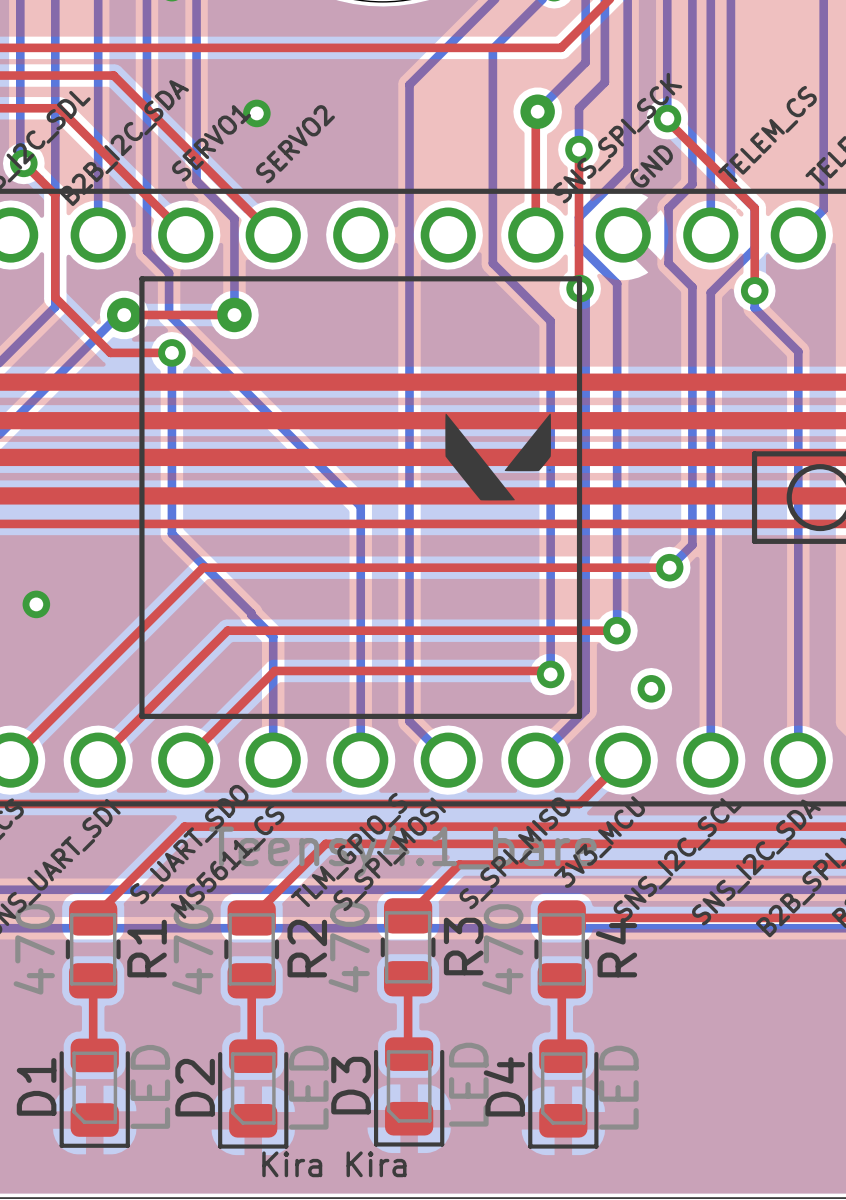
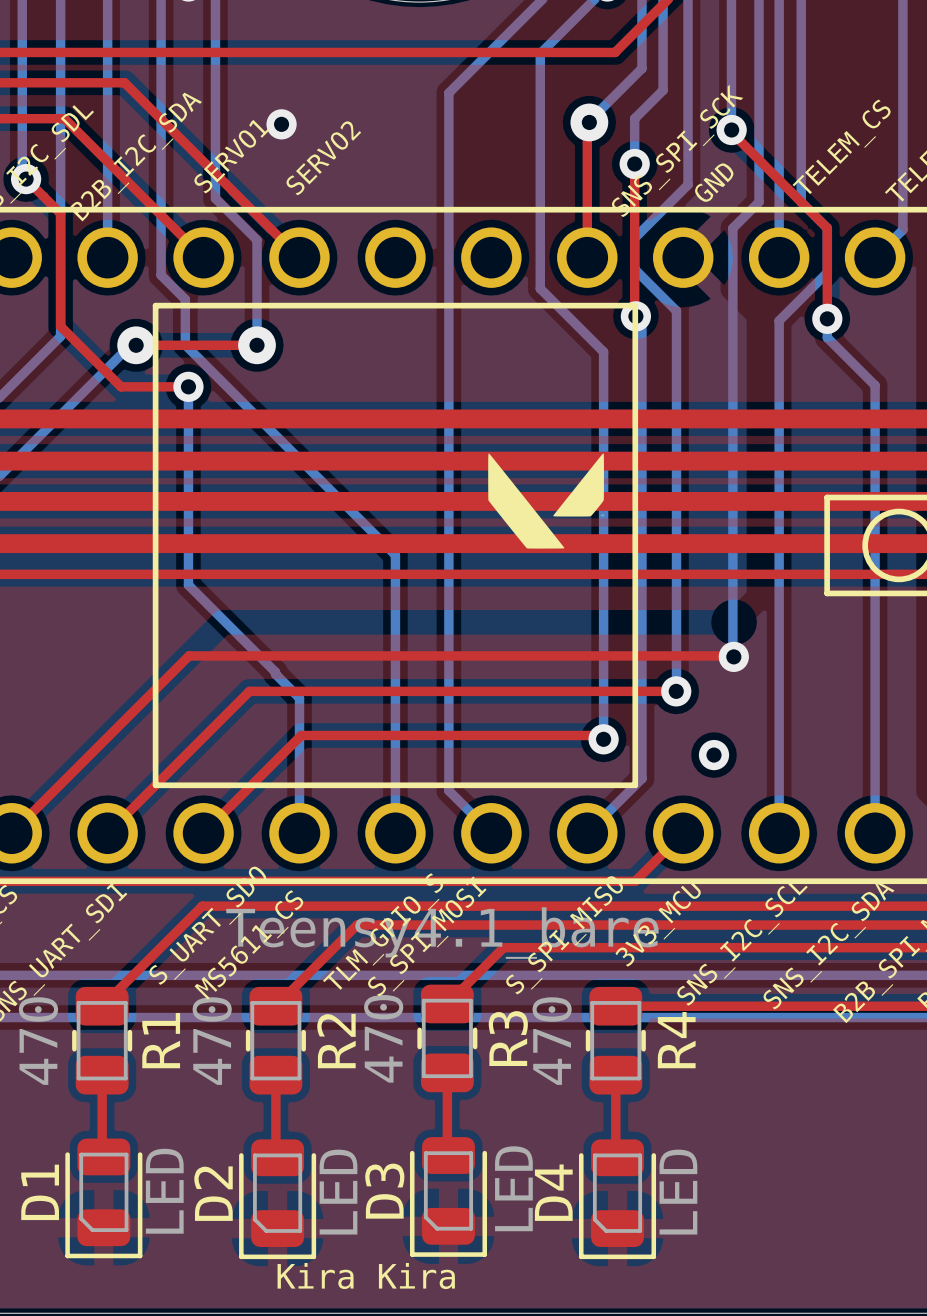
bottom track: (668, 263) (692, 287) (692, 544) (669, 567) -> (732, 288) (733, 656)
top track: (669, 567) (203, 567) (172, 598) -> (733, 656) (189, 655)
via position: (669, 567) -> (733, 656)
via: (36, 604) -> none

